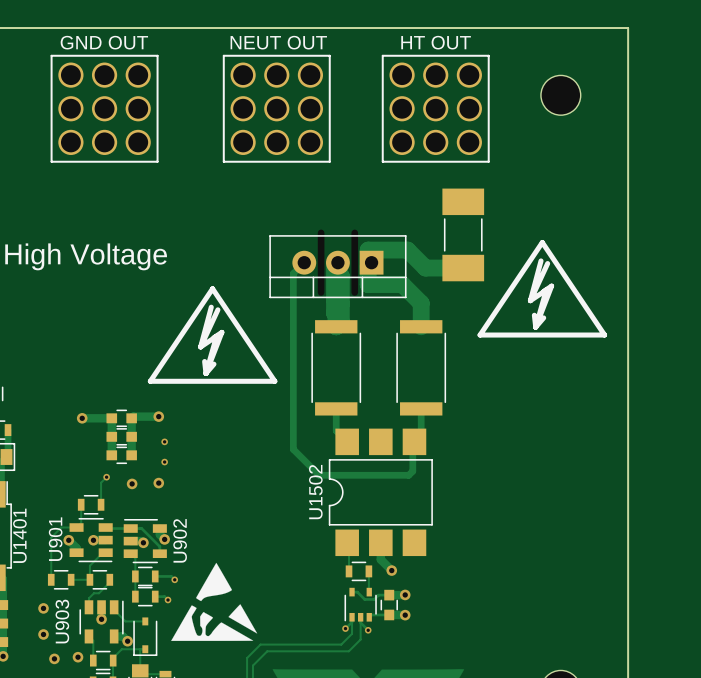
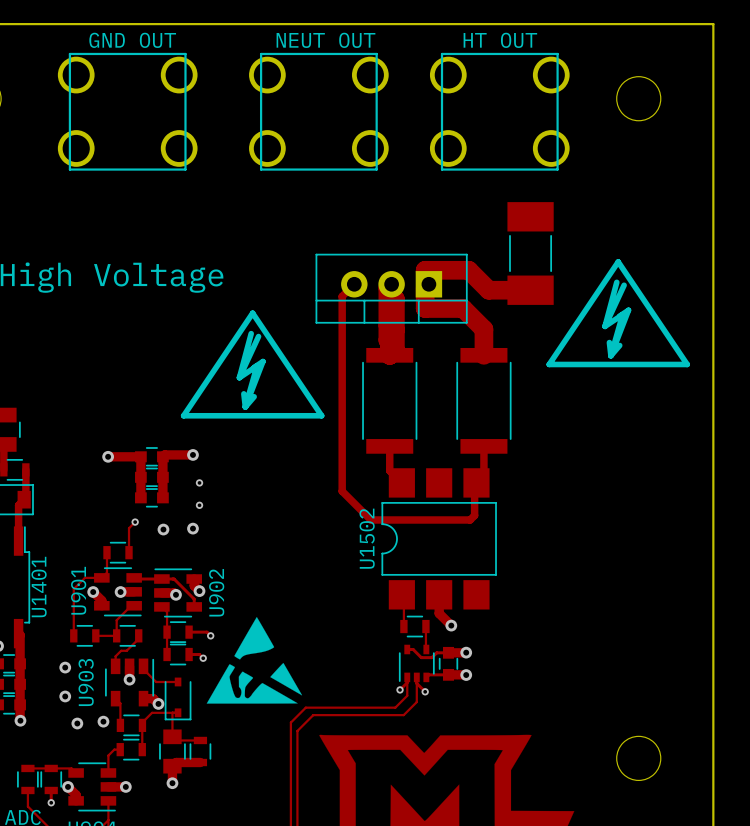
part footprint: [50, 54, 159, 163] -> [57, 52, 198, 171]
part footprint: [222, 54, 331, 163] -> [249, 52, 389, 171]
part footprint: [381, 54, 490, 163] -> [429, 52, 570, 171]

